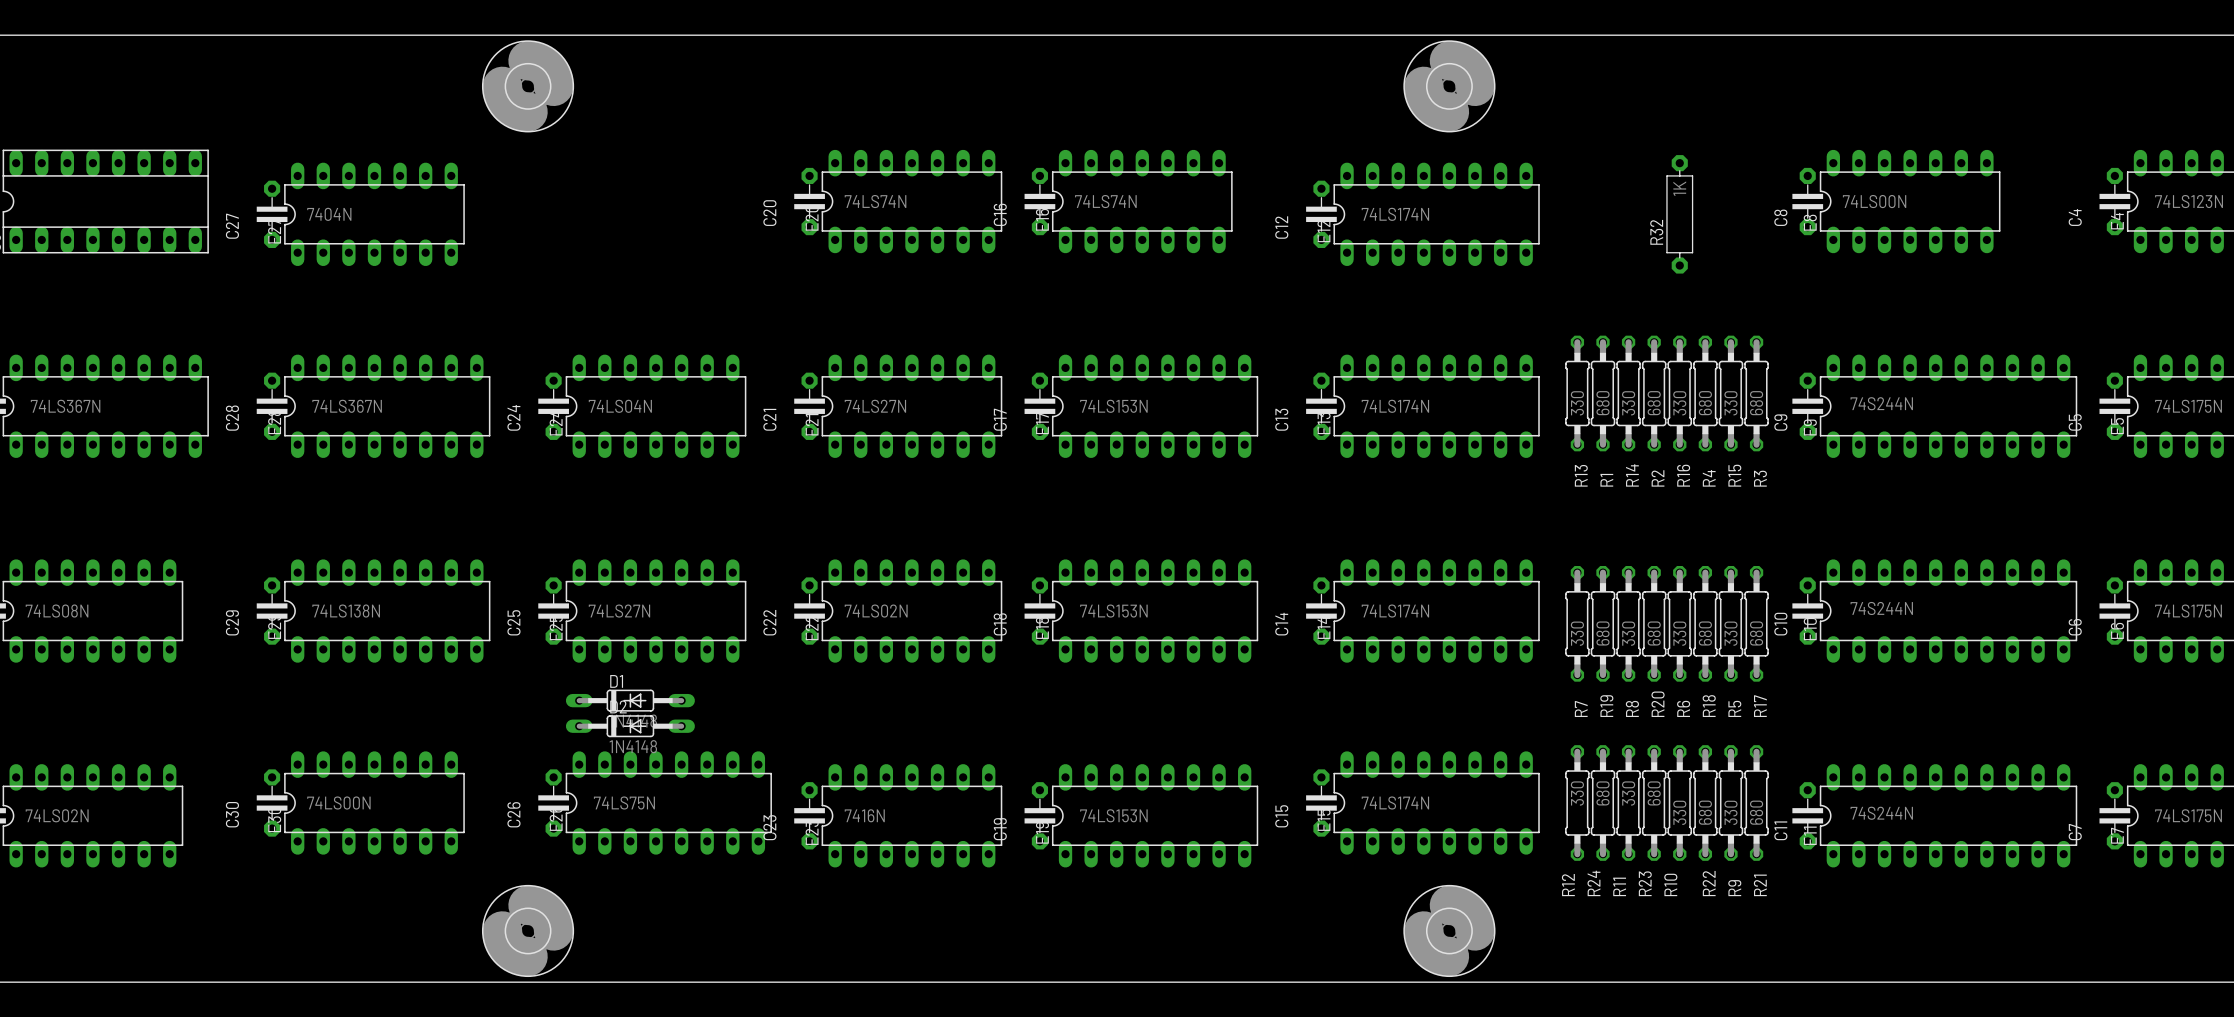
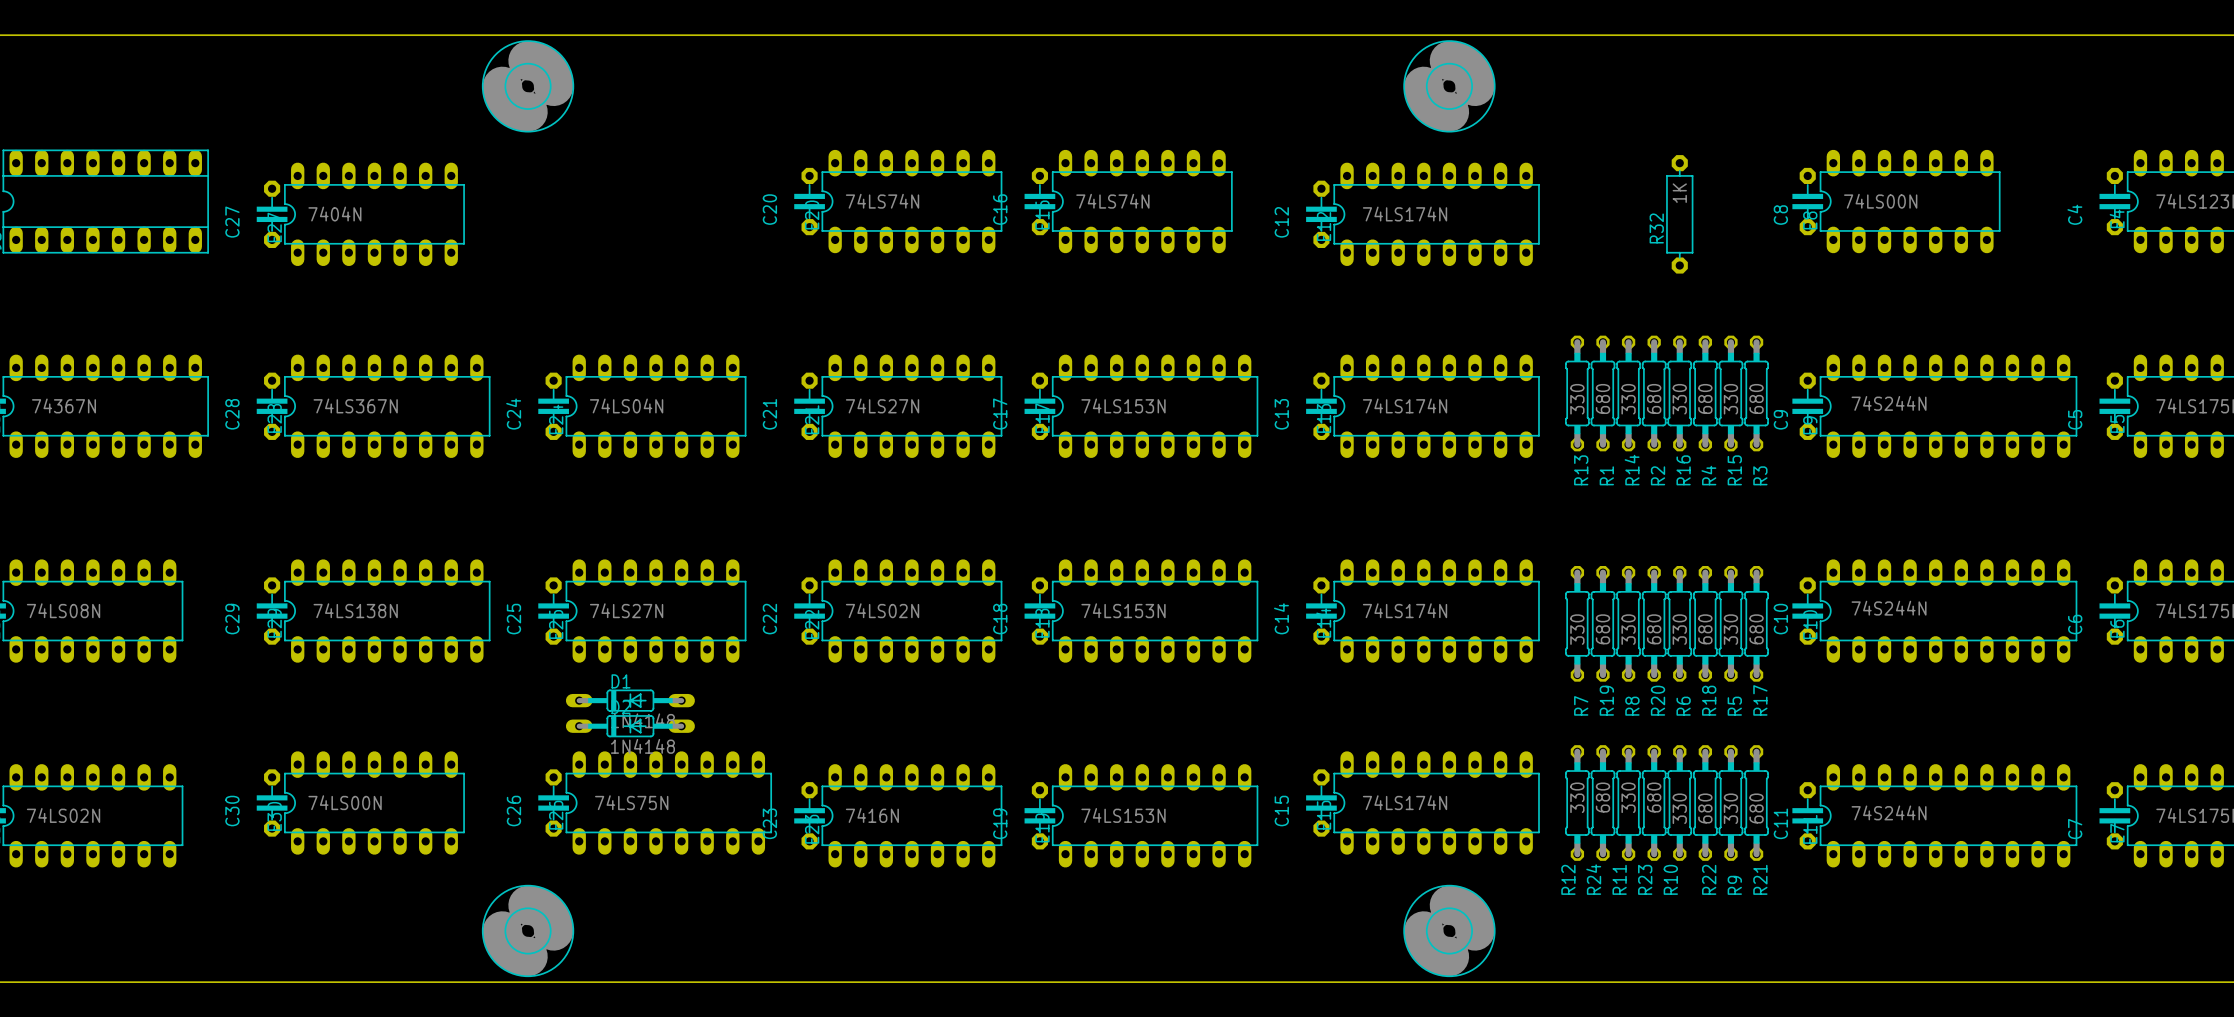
part value: 74LS367N (65, 406) -> 74367N (63, 405)

